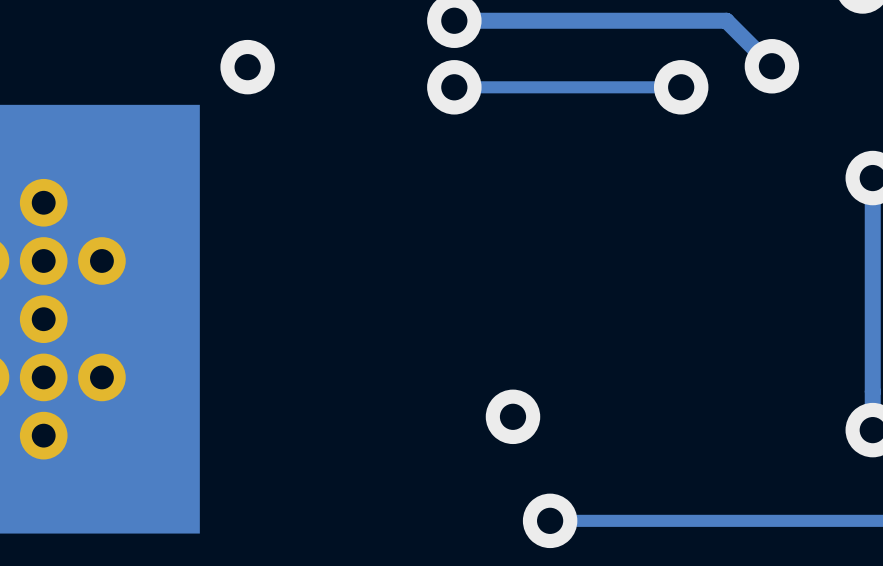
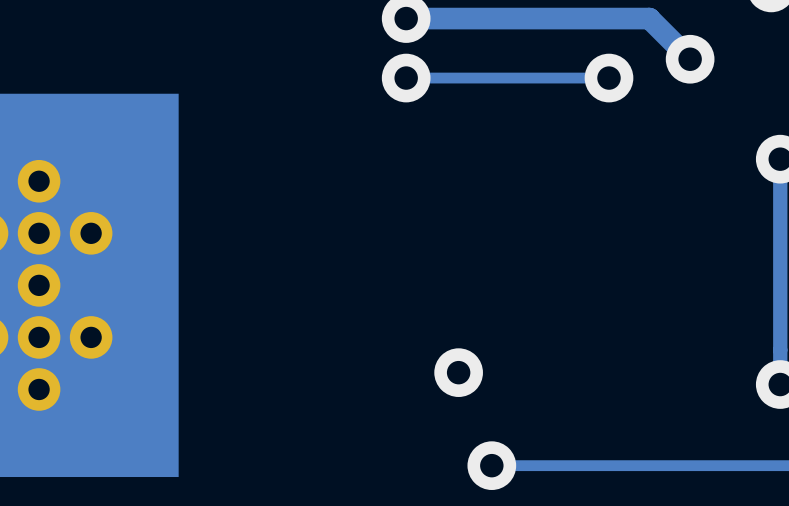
track width: thin (454, 20) (726, 20) (771, 66) -> thick (406, 18) (649, 18) (690, 59)
via: (247, 67) -> none

